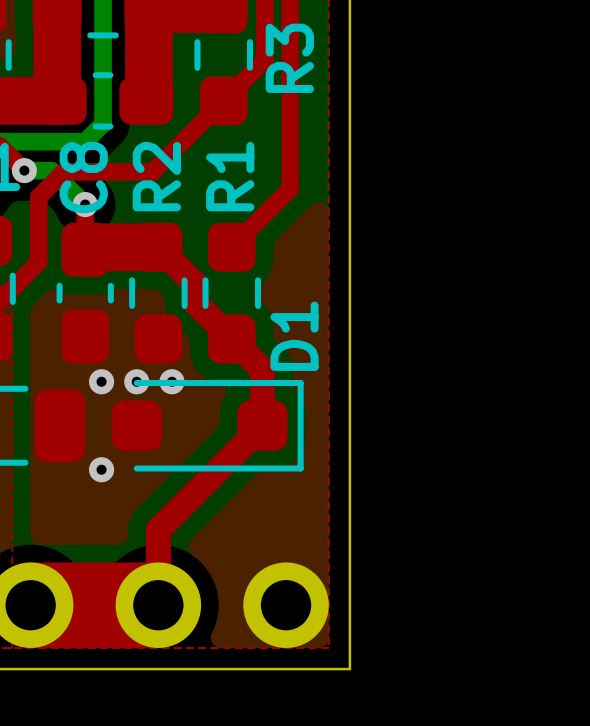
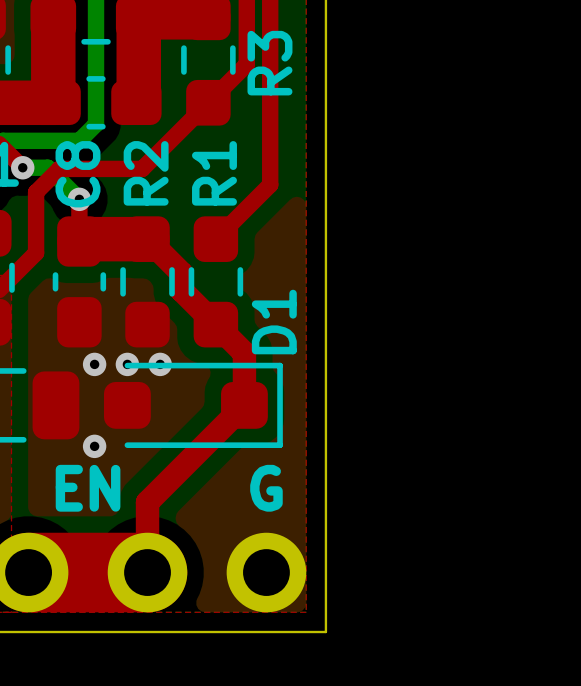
text: none -> EN (88, 488)
text: none -> G (266, 488)

